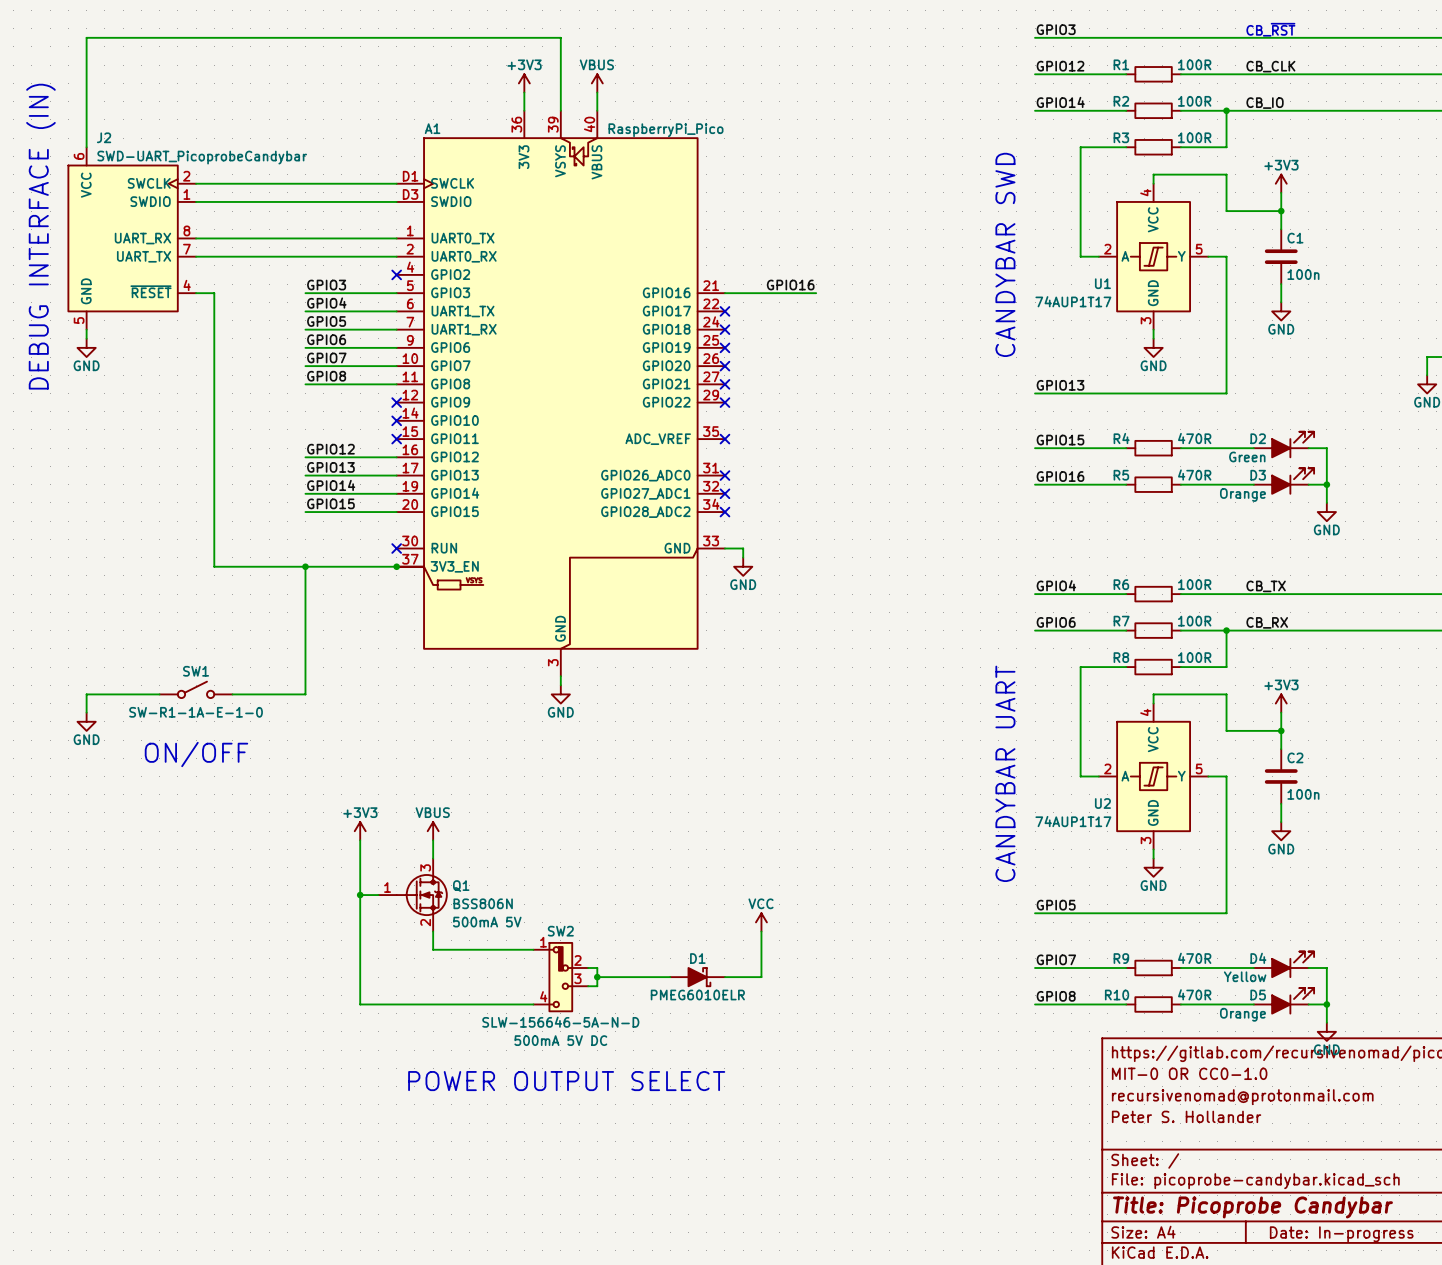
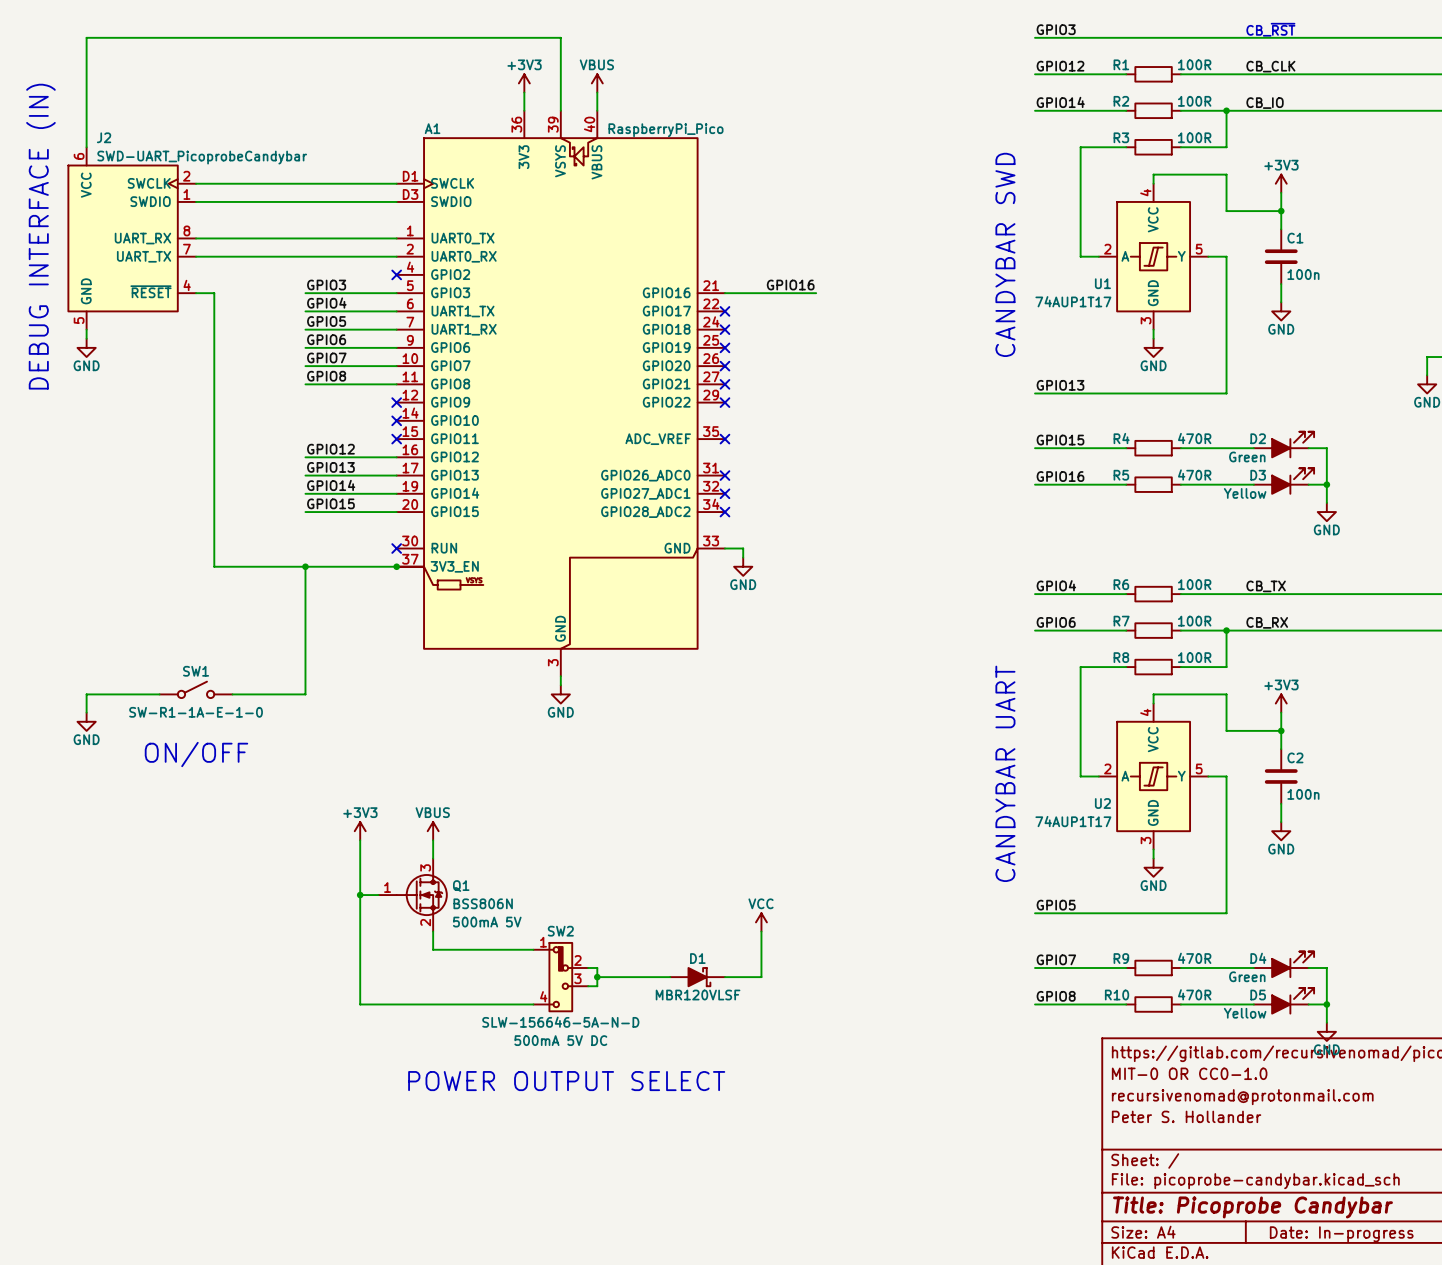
D3 value: Orange (1242, 494) -> Yellow (1245, 493)
D4 value: Yellow (1245, 976) -> Green (1247, 976)
D1 value: PMEG6010ELR (697, 995) -> MBR120VLSF (698, 995)
D5 value: Orange (1242, 1014) -> Yellow (1245, 1013)

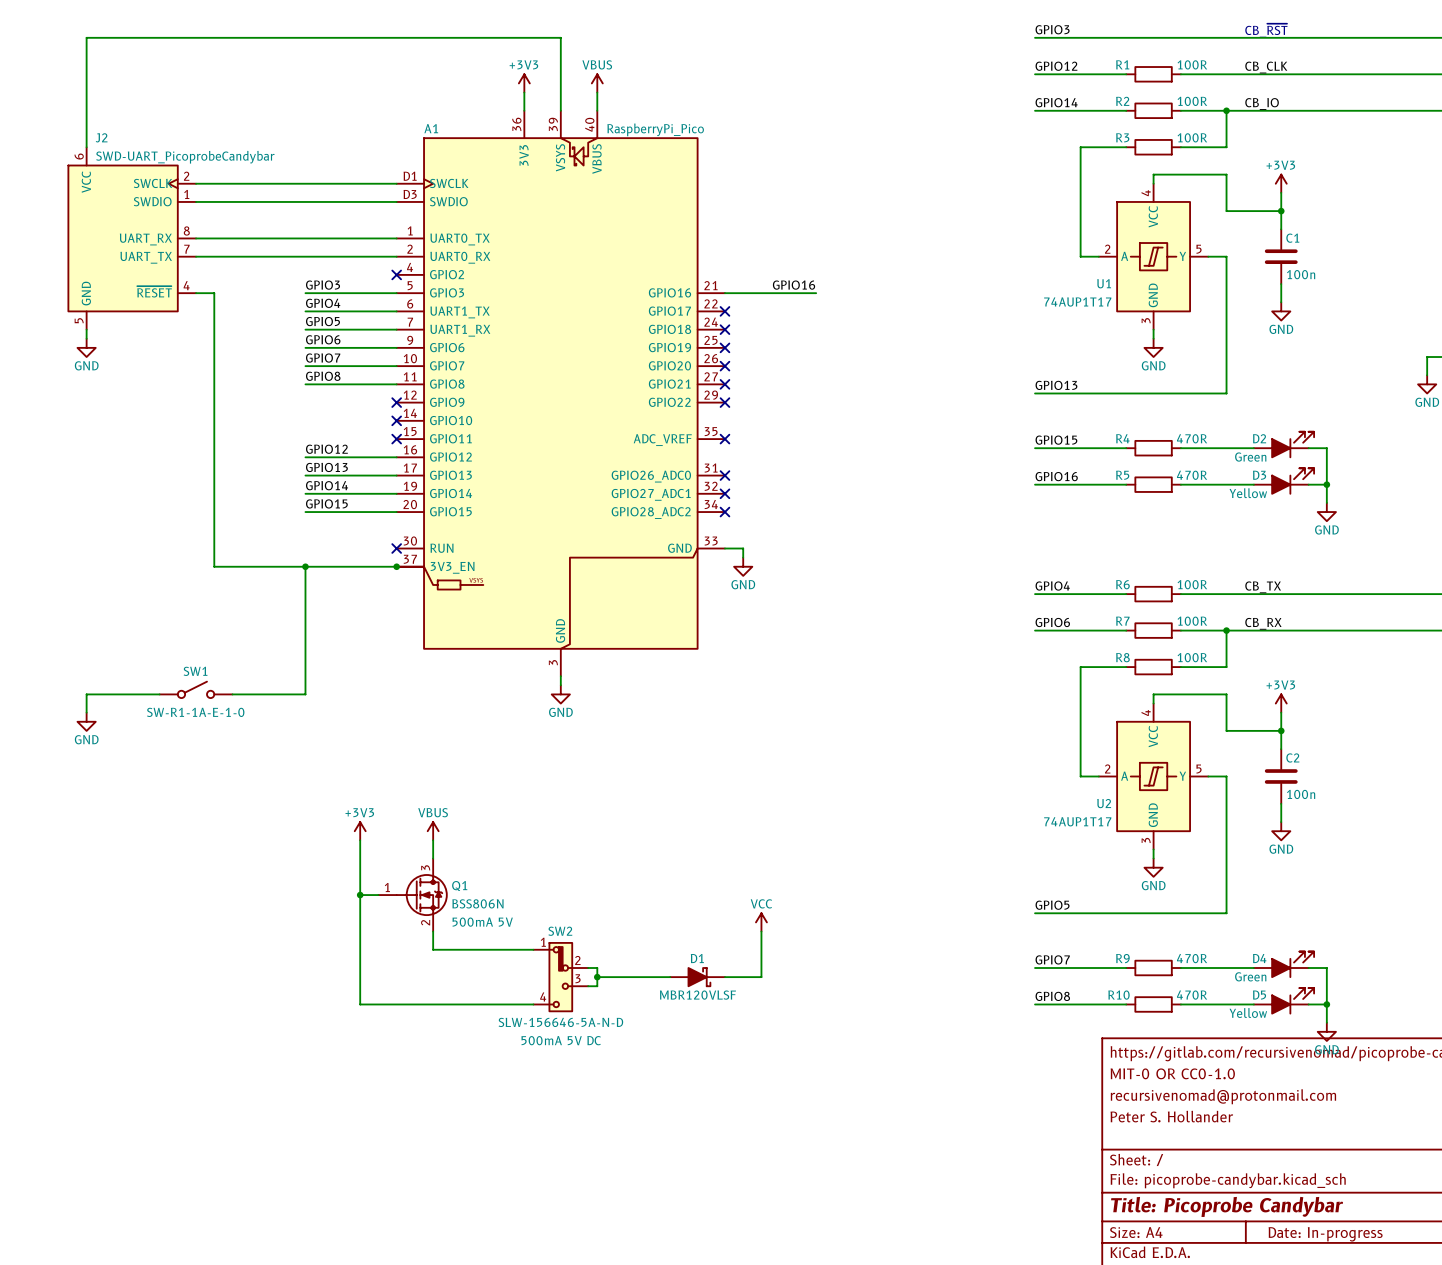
text: DEBUG INTERFACE (IN) (40, 236) -> none
text: CANDYBAR SWD (1005, 254) -> none
text: ON/OFF (196, 754) -> none
text: CANDYBAR UART (1005, 773) -> none
text: POWER OUTPUT SELECT (566, 1081) -> none

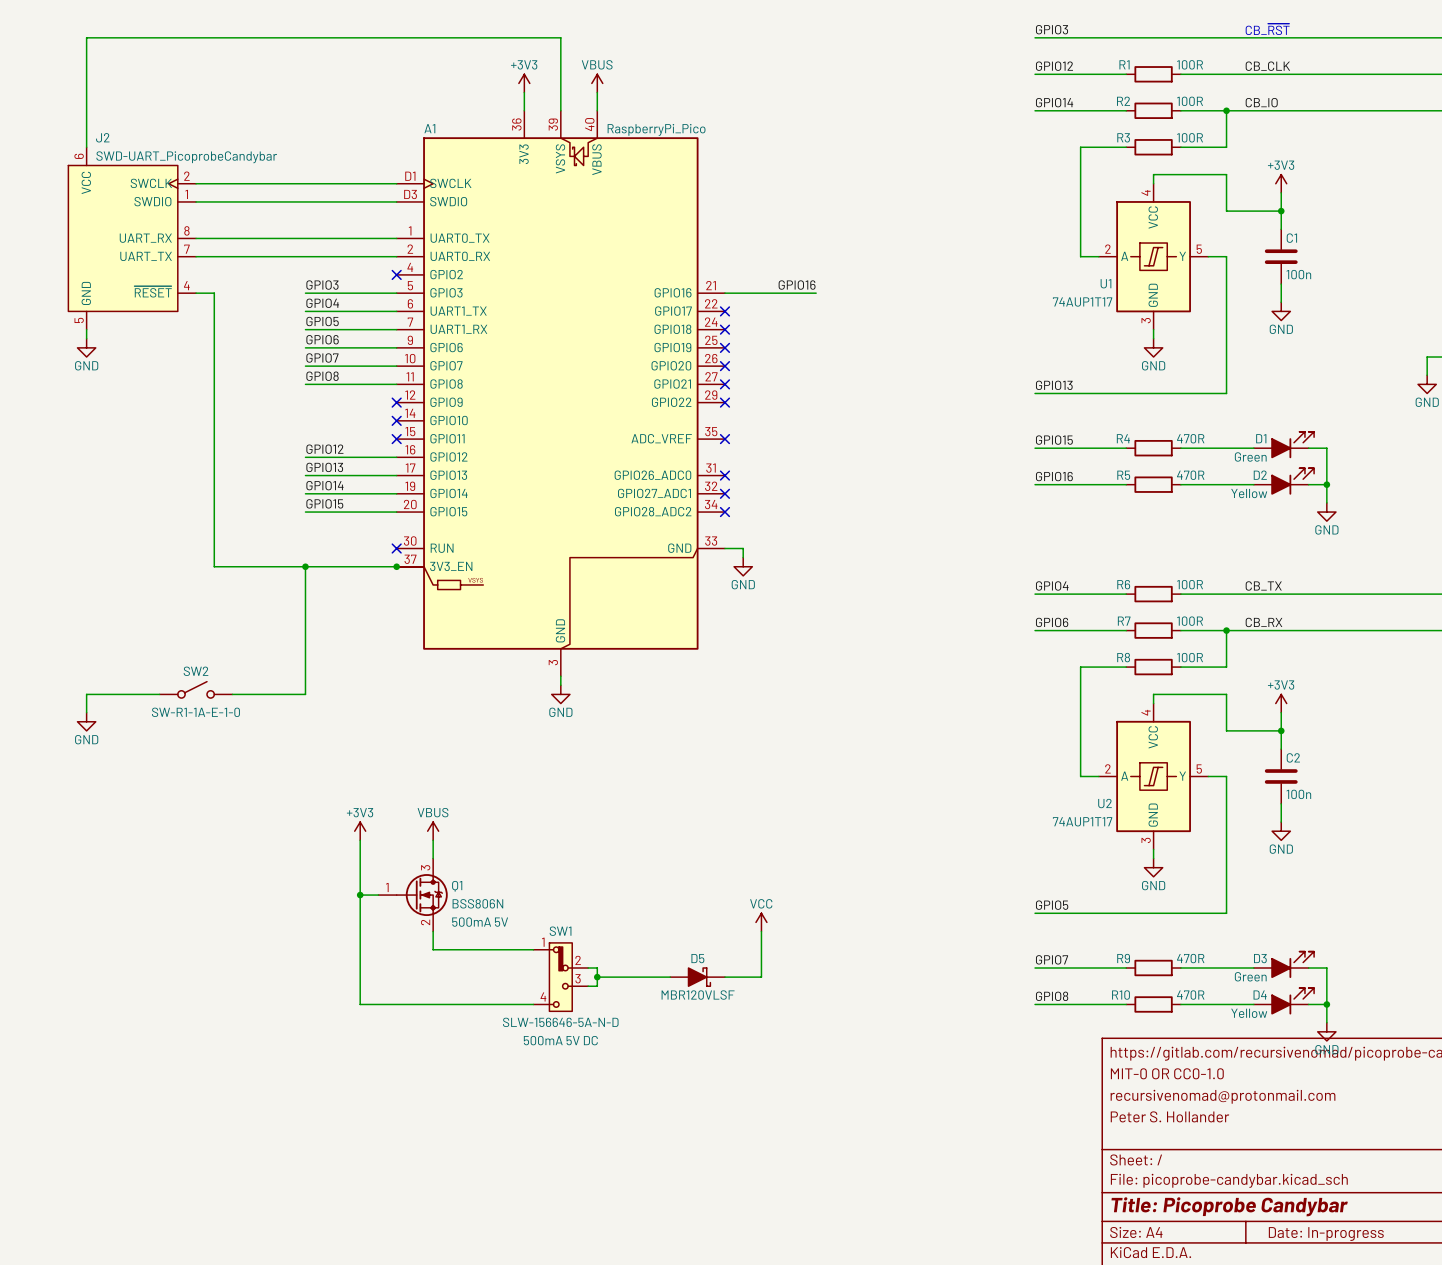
D2 name: D2 (1259, 438) -> D1 (1261, 438)
D3 name: D3 (1259, 475) -> D2 (1260, 475)
SW1 name: SW1 (195, 671) -> SW2 (196, 671)
SW2 name: SW2 (560, 931) -> SW1 (560, 931)
D1 name: D1 (697, 958) -> D5 (697, 958)
D4 name: D4 (1259, 958) -> D3 (1260, 958)
D5 name: D5 (1259, 995) -> D4 (1260, 995)

